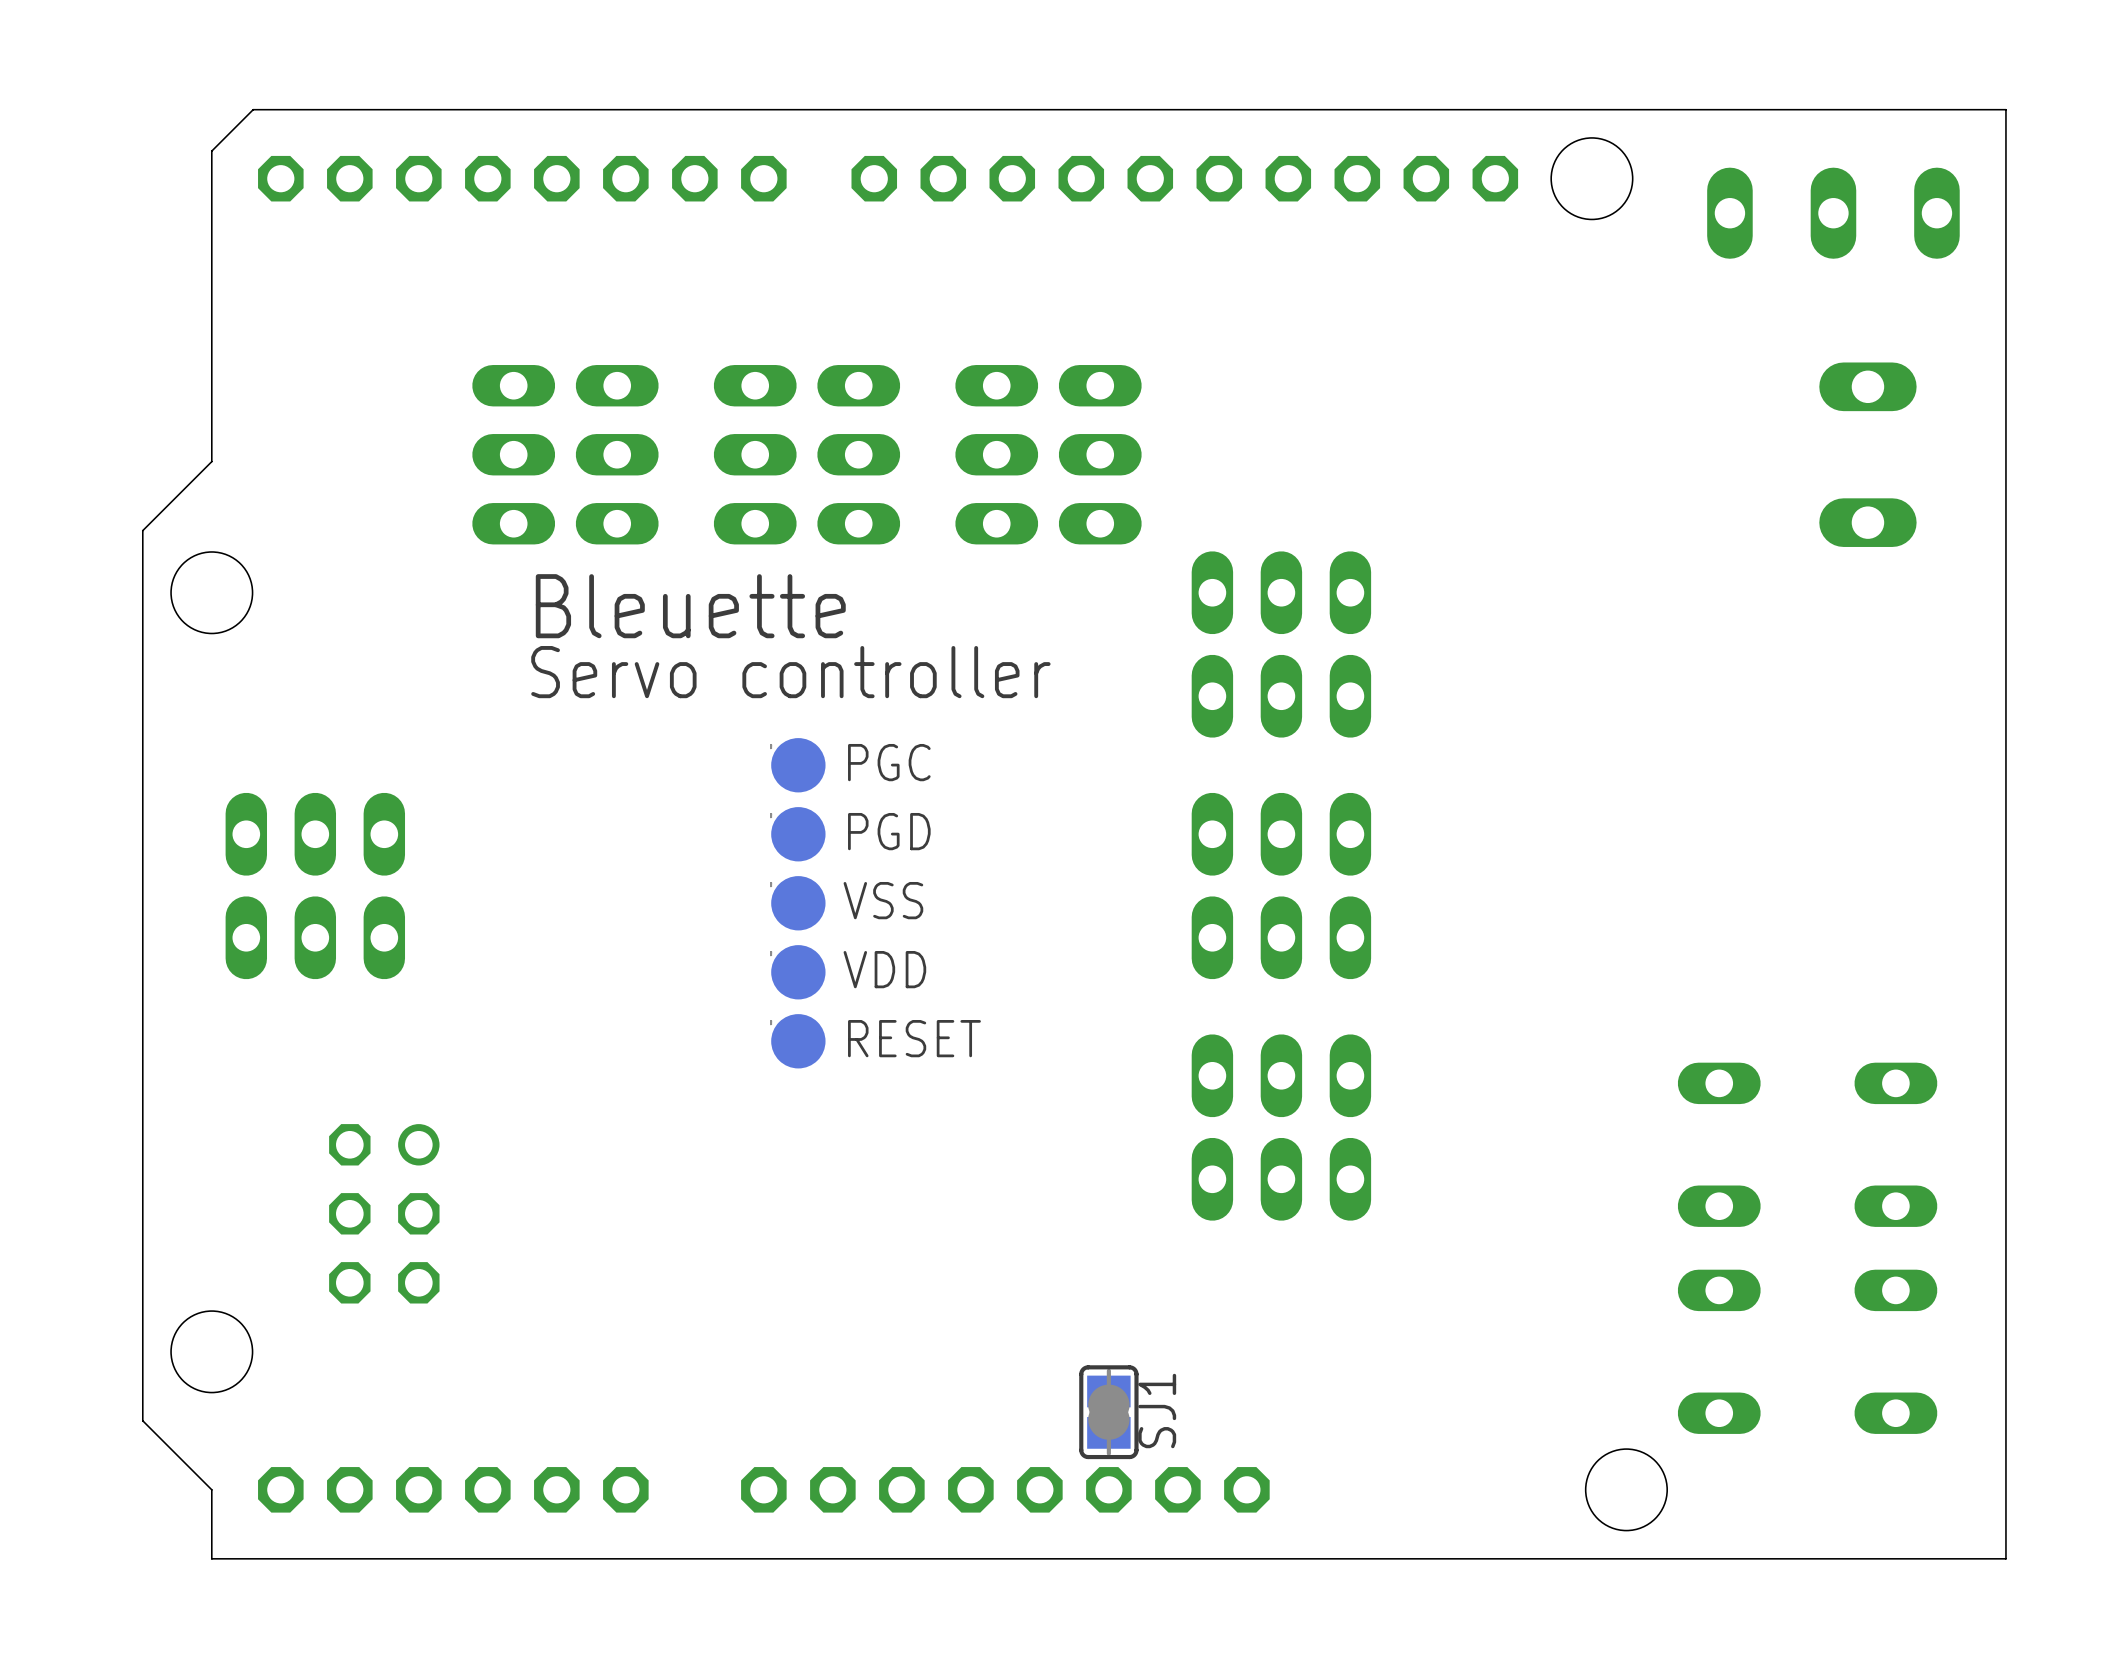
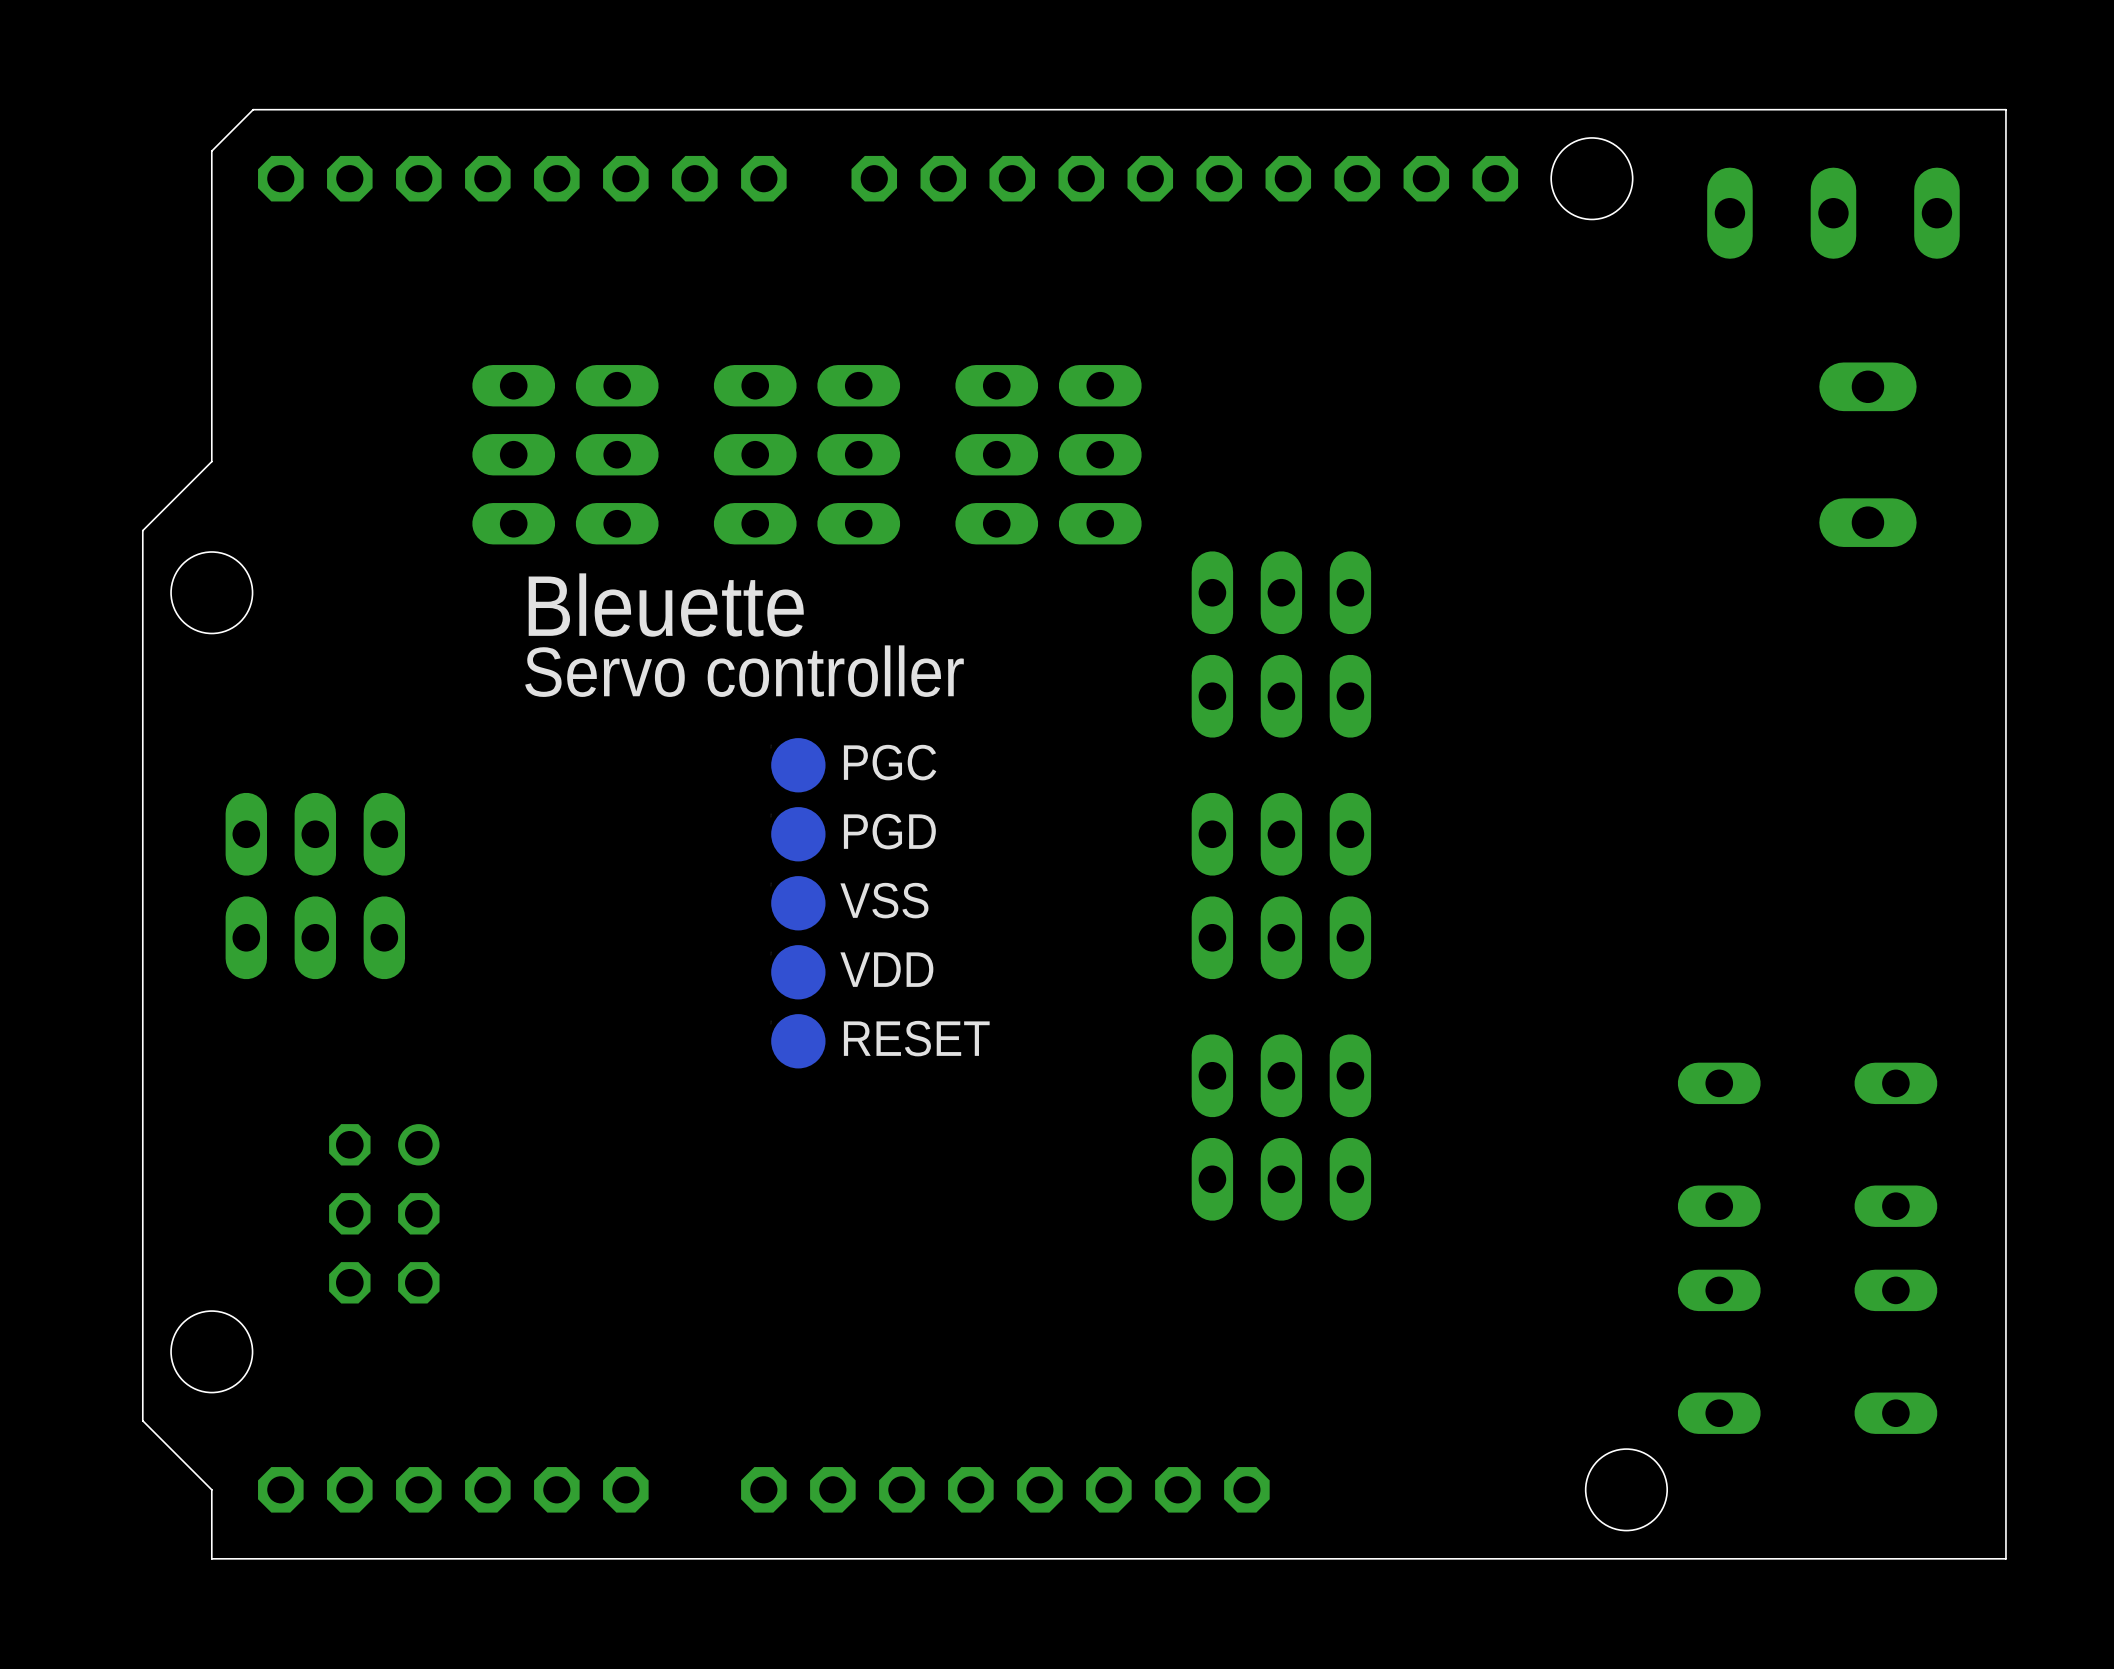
SJ1: (1108, 1412) -> none

